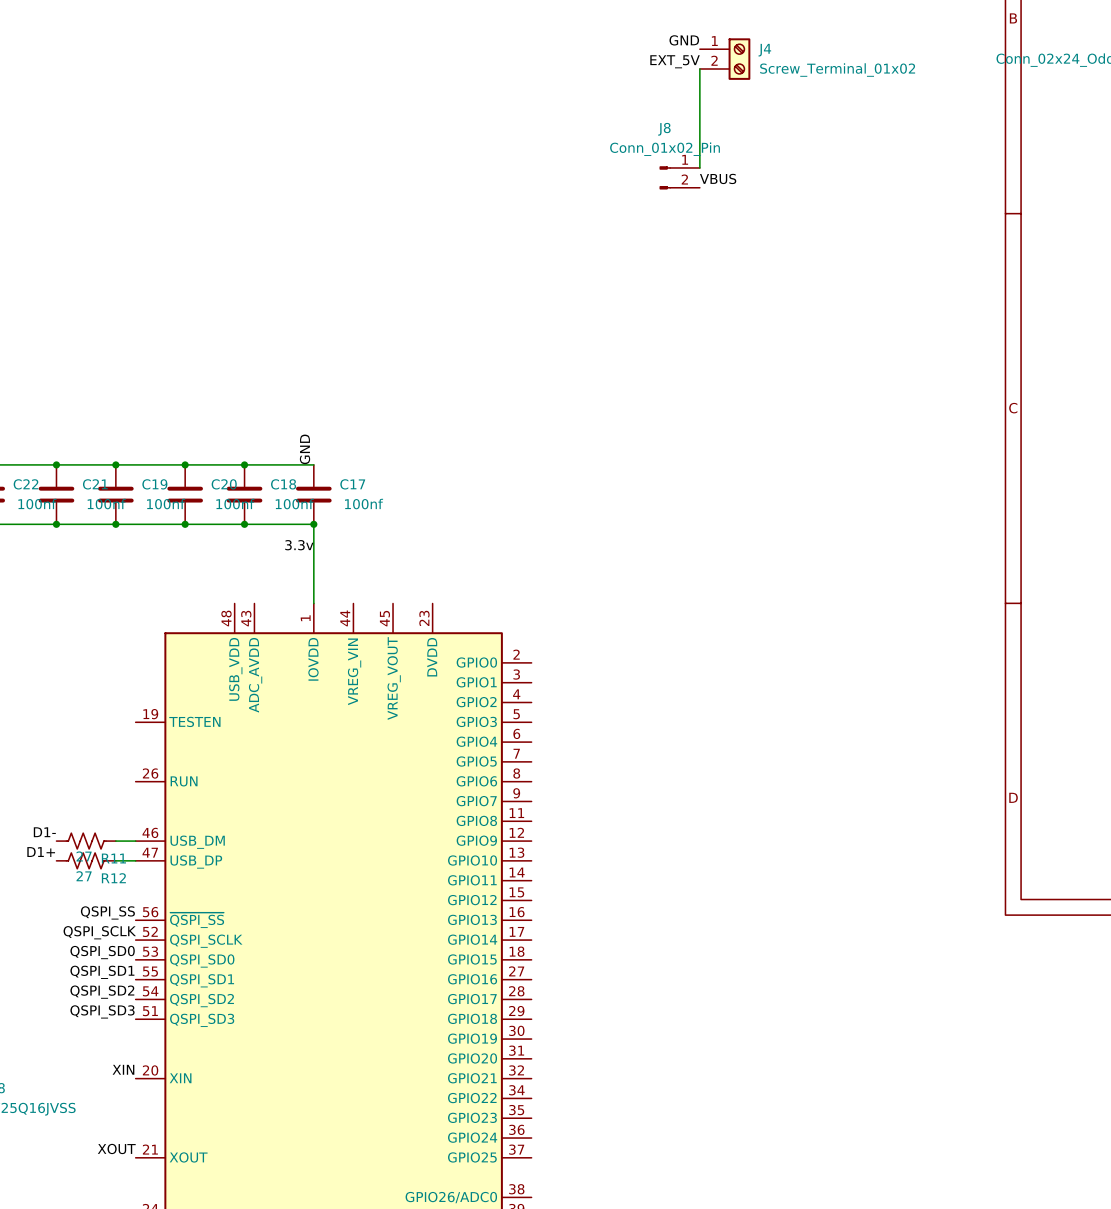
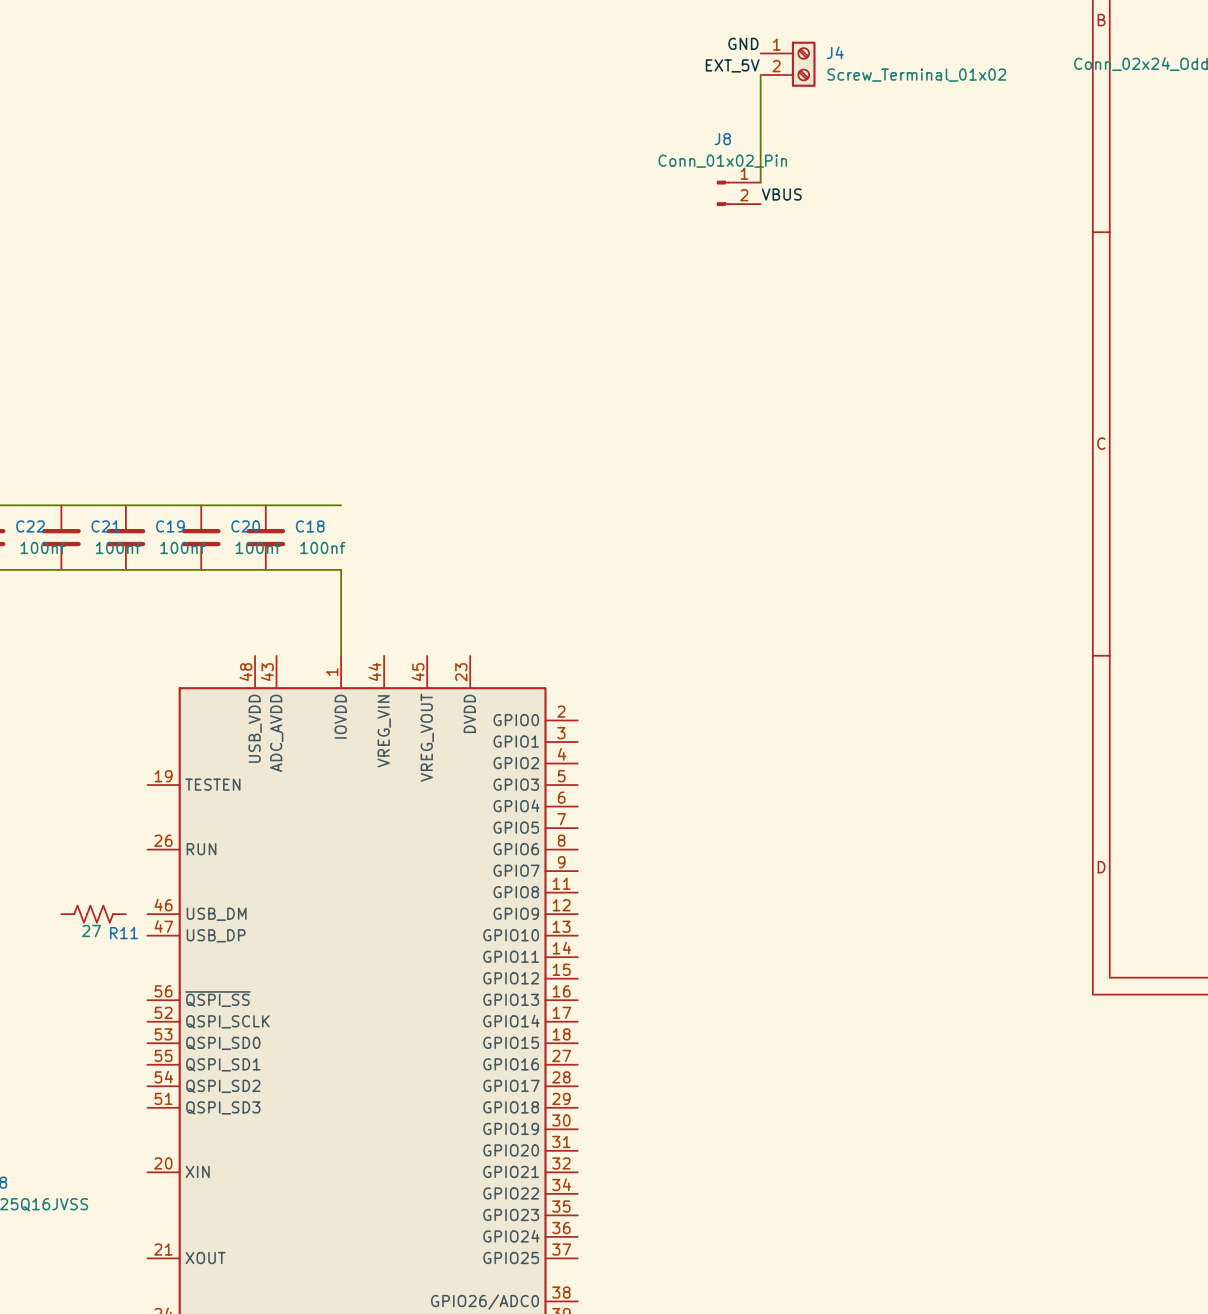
label: GND (305, 449) -> none
junction: (56, 464) -> none
junction: (115, 464) -> none
junction: (185, 464) -> none
junction: (244, 464) -> none
C17: 100nf (313, 494) -> none
junction: (56, 524) -> none
junction: (115, 524) -> none
junction: (185, 524) -> none
junction: (244, 524) -> none
junction: (313, 524) -> none
label: 3.3v (299, 545) -> none
label: D1- (44, 832) -> none
wire: (115, 841) (135, 841) -> none
label: D1+ (41, 852) -> none
R12: 27 (86, 860) -> none
wire: (115, 860) (135, 860) -> none
label: QSPI_SS (107, 912) -> none
label: QSPI_SCLK (99, 932) -> none
label: QSPI_SD0 (102, 952) -> none
label: QSPI_SD1 (102, 972) -> none
label: QSPI_SD2 (102, 992) -> none
label: QSPI_SD3 (102, 1011) -> none
label: XIN (123, 1069) -> none
label: XOUT (116, 1148) -> none

